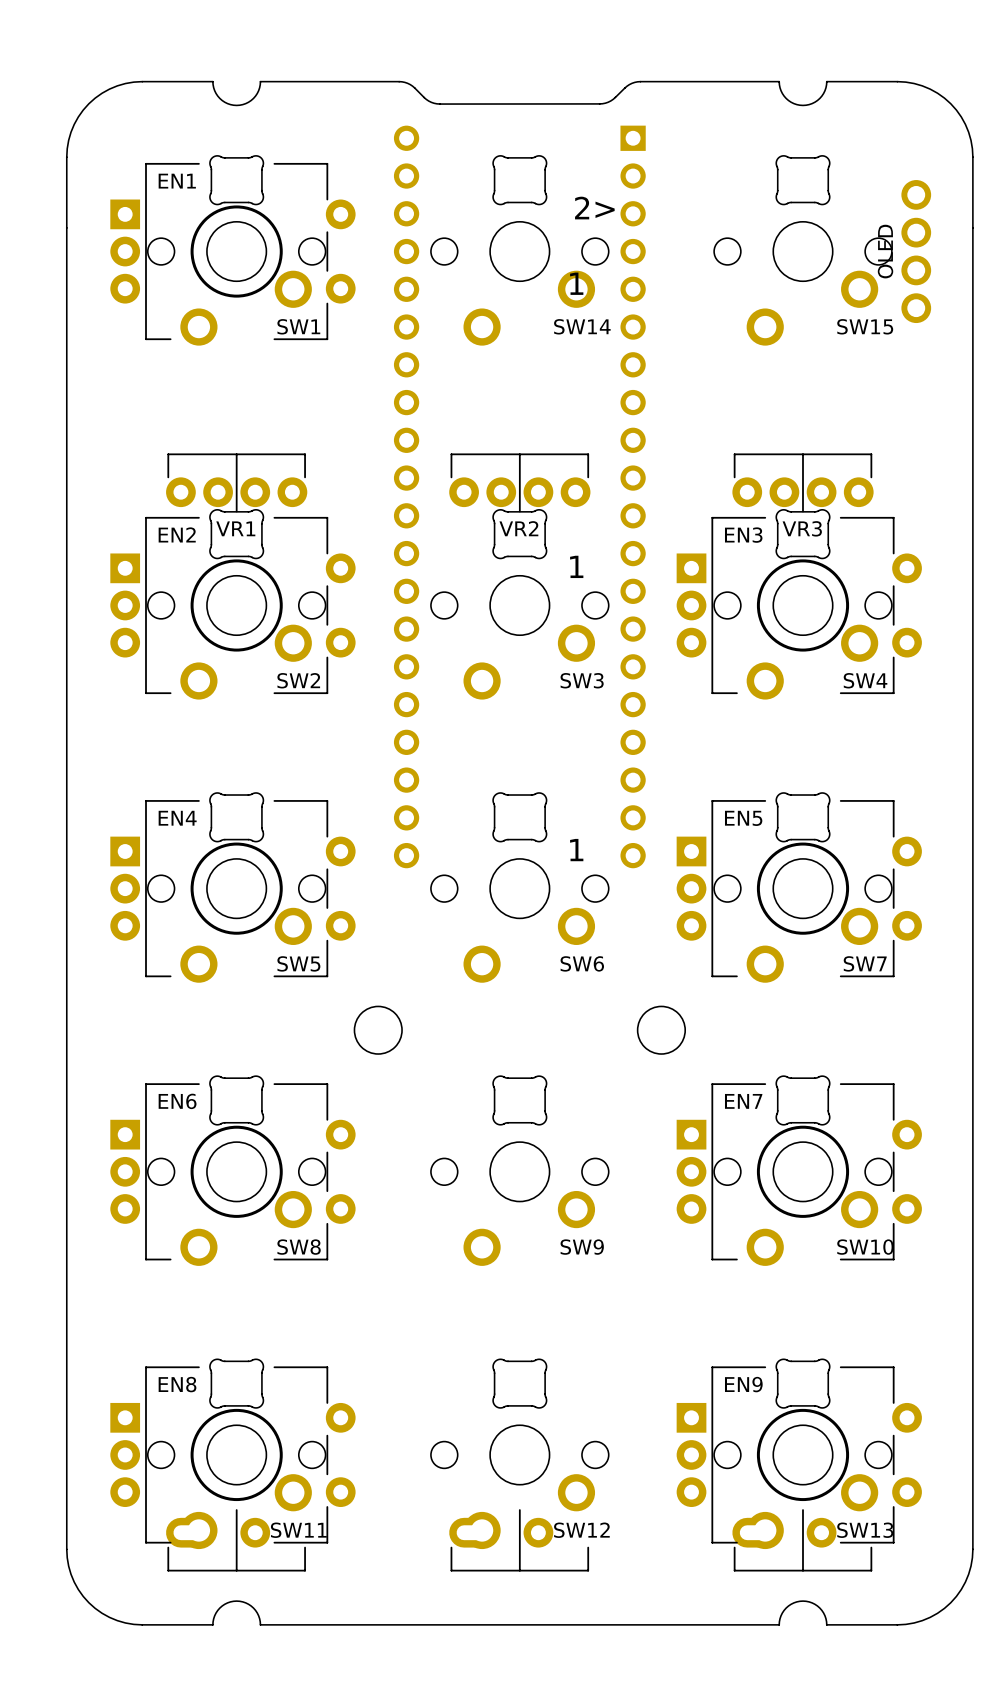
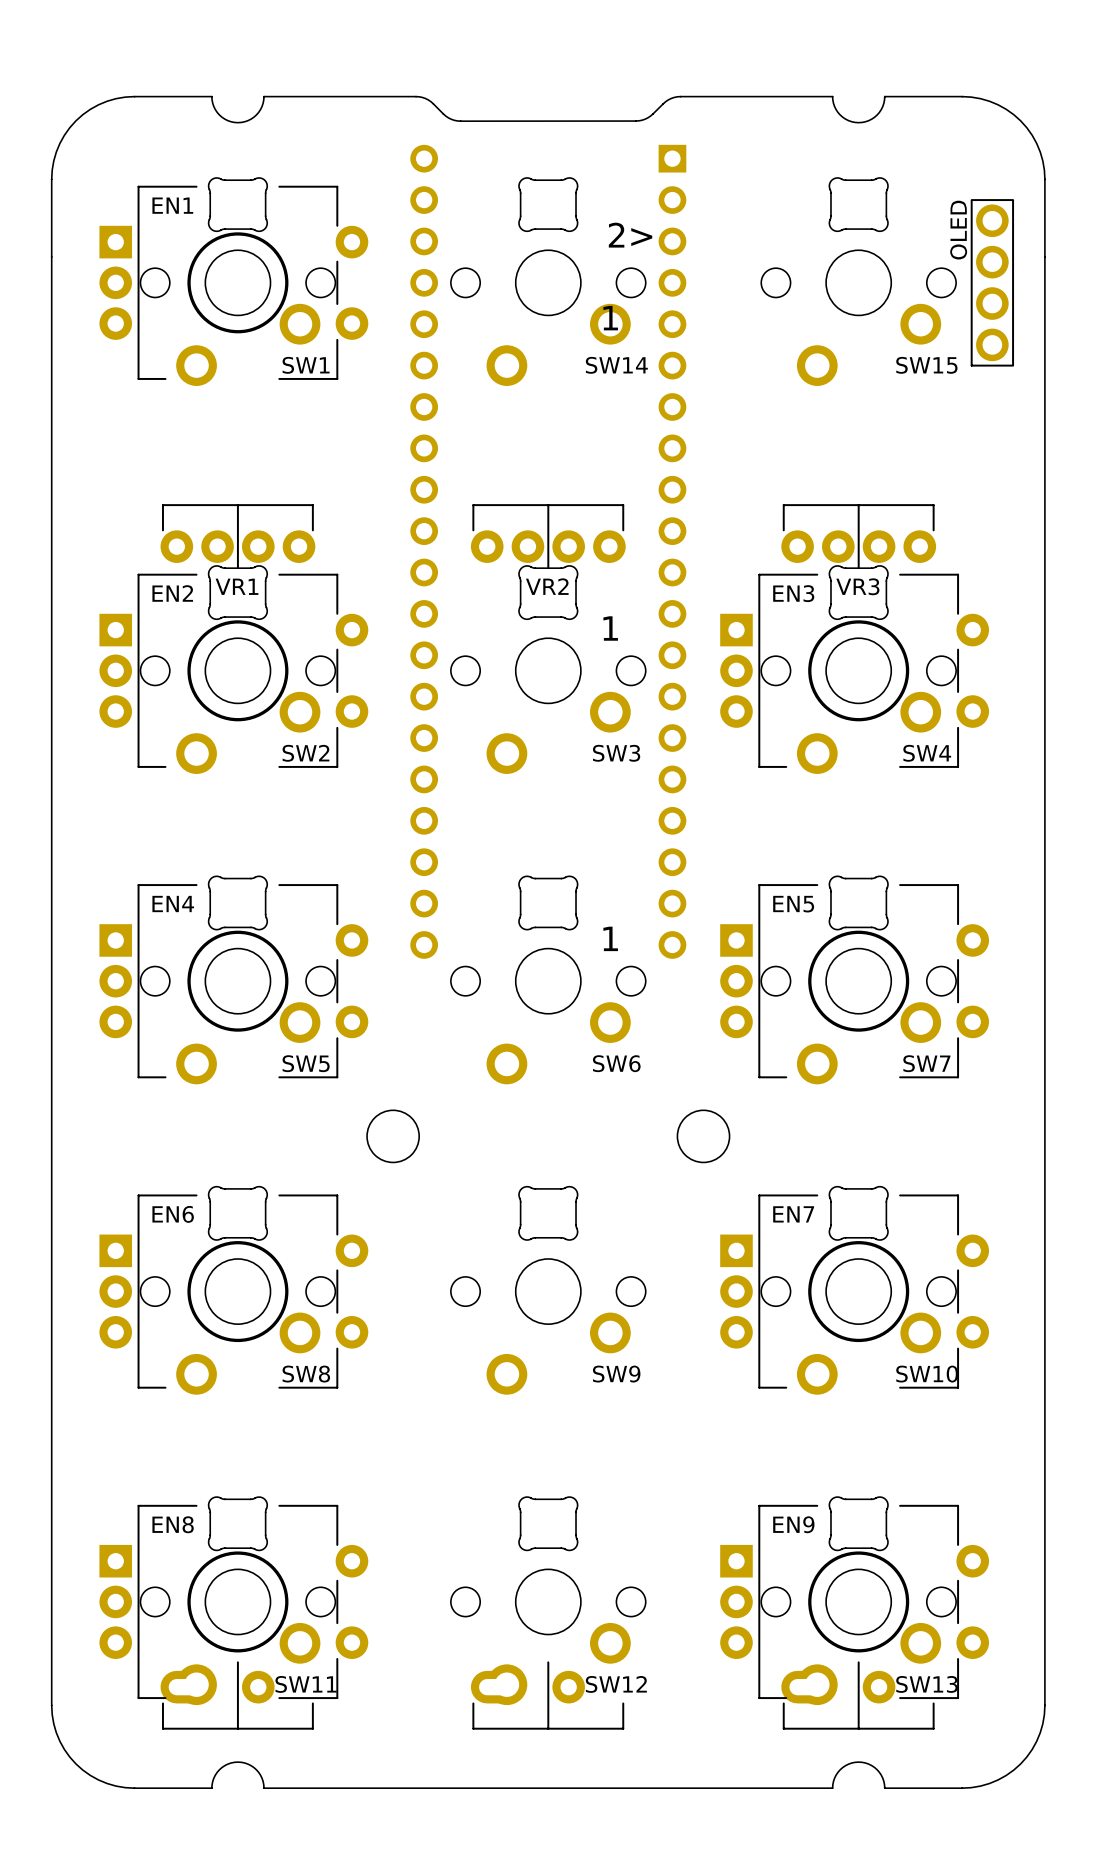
part footprint: [901, 180, 932, 324] -> [970, 199, 1015, 367]

